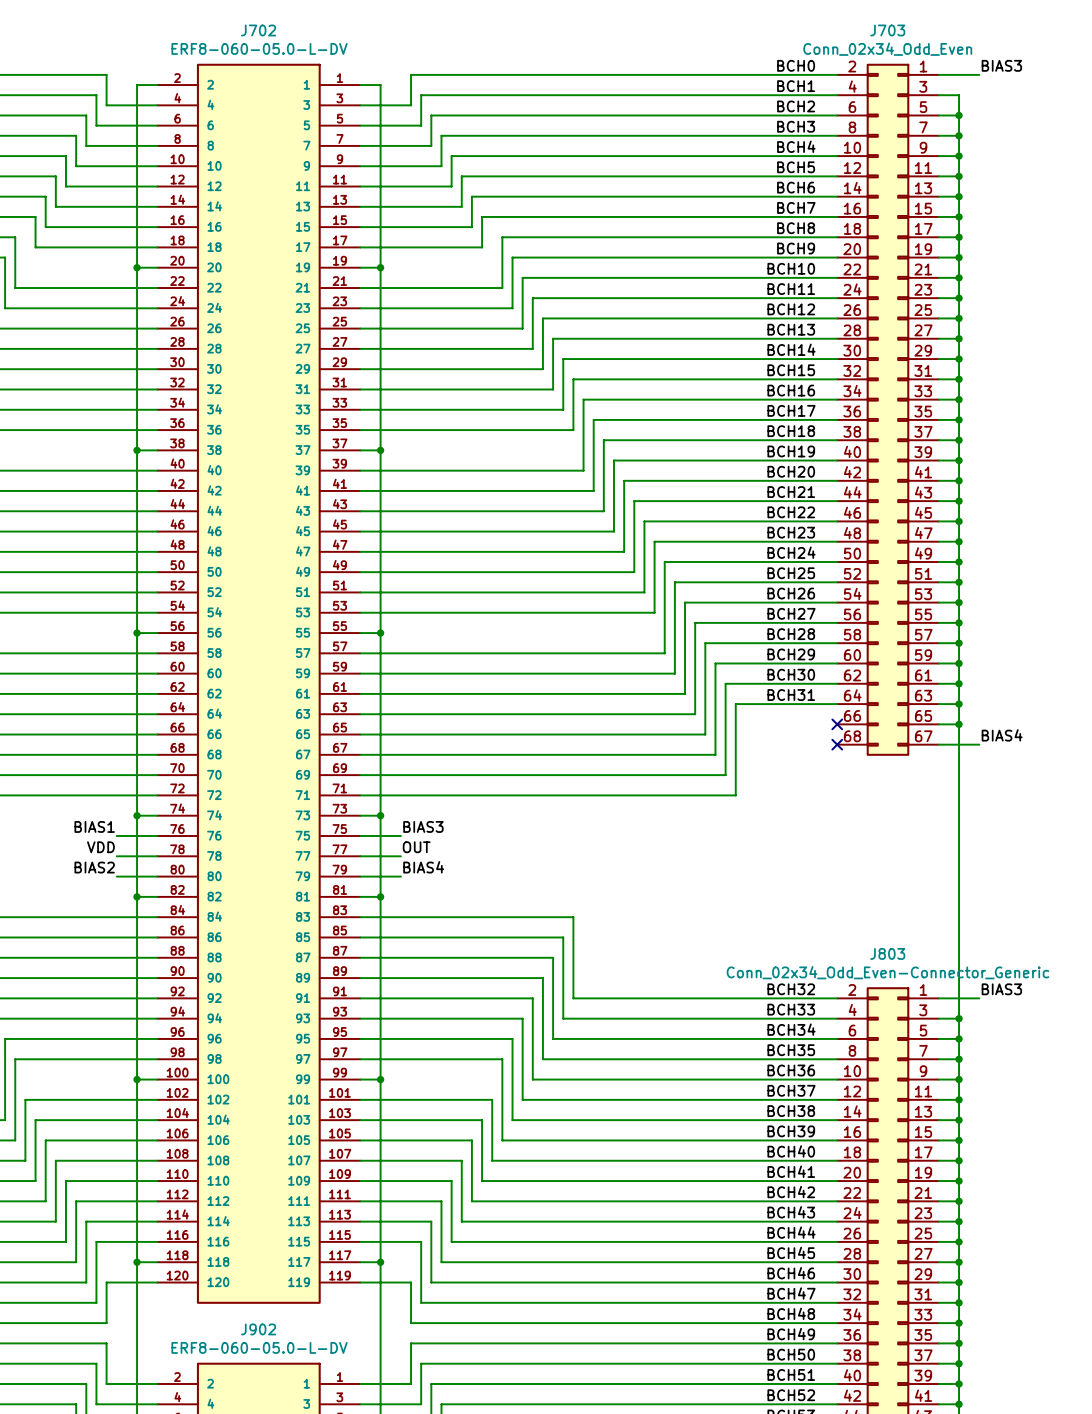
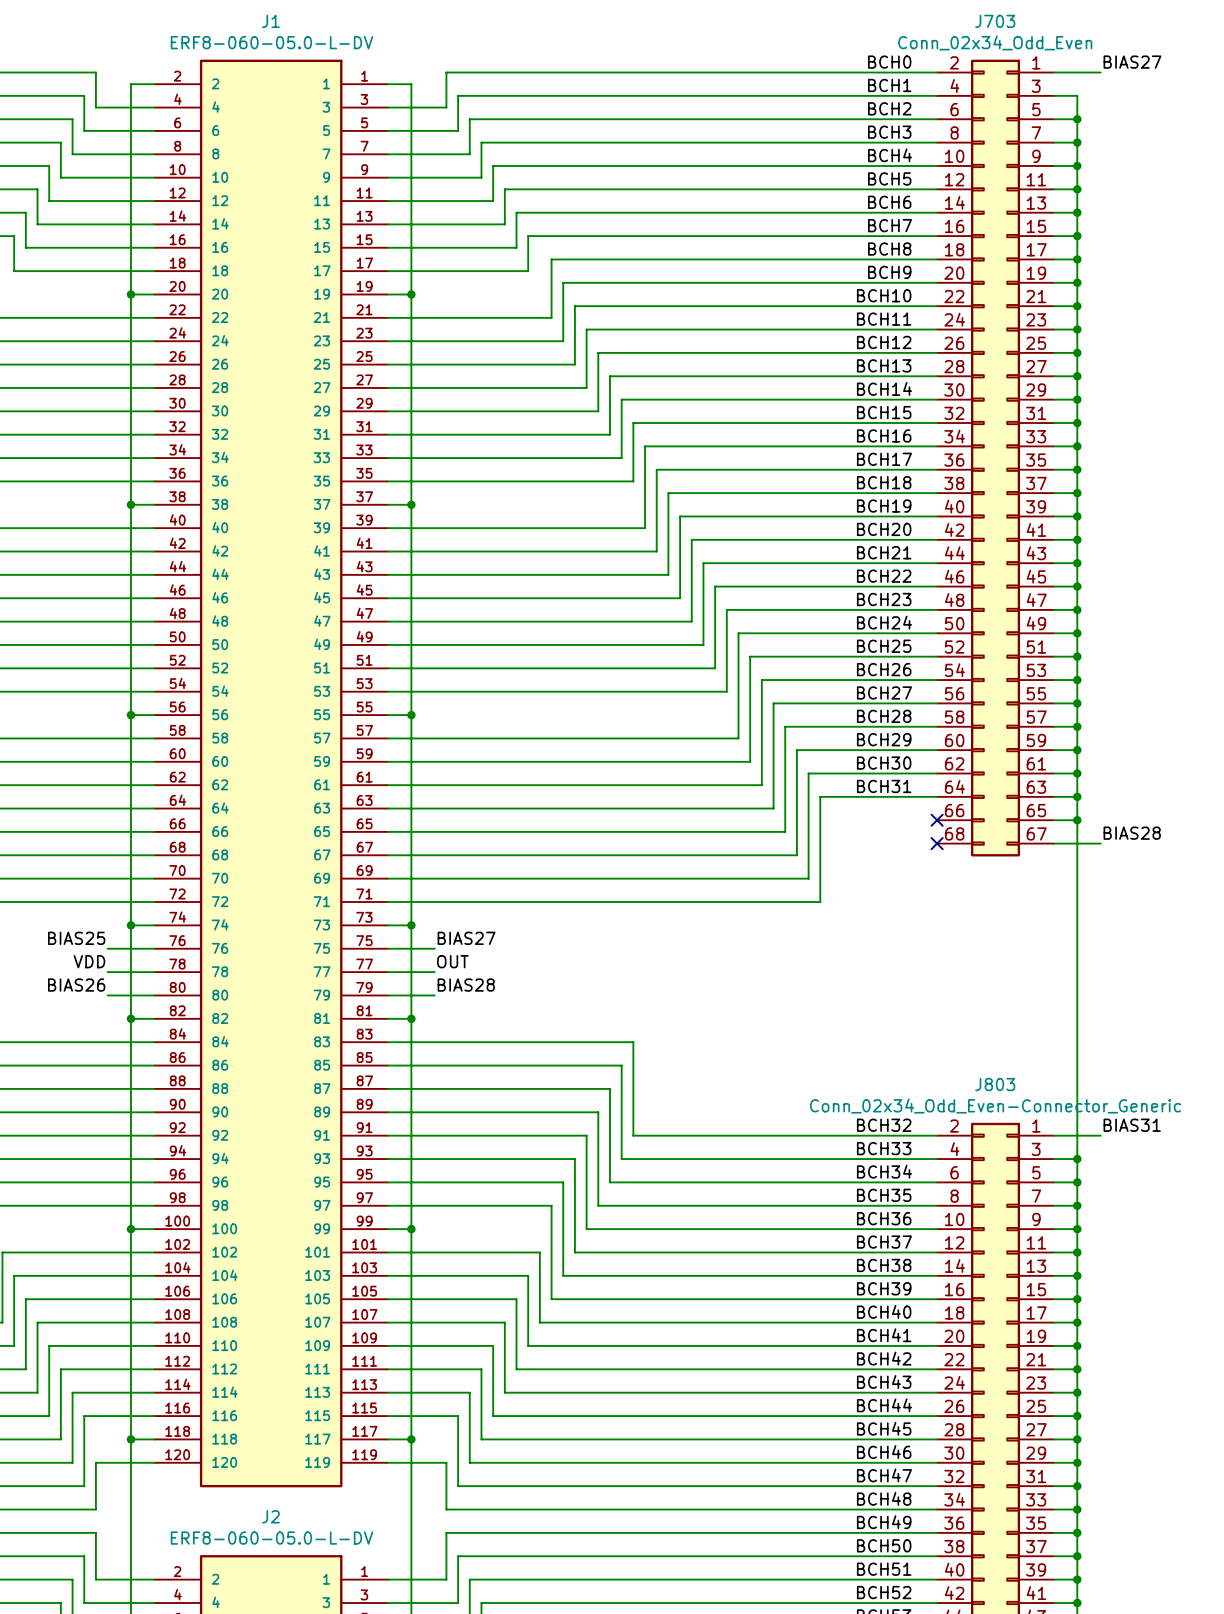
J702 name: J702 (258, 30) -> J1 (270, 21)
label: BIAS3 (1001, 65) -> BIAS27 (1132, 62)
label: BIAS4 (1002, 735) -> BIAS28 (1132, 833)
label: BIAS1 (94, 826) -> BIAS25 (76, 938)
label: BIAS3 (423, 826) -> BIAS27 (466, 938)
label: BIAS2 (94, 867) -> BIAS26 (76, 985)
label: BIAS4 (423, 867) -> BIAS28 (466, 985)
label: BIAS3 (1001, 989) -> BIAS31 (1132, 1125)
J902 name: J902 (258, 1329) -> J2 (270, 1516)

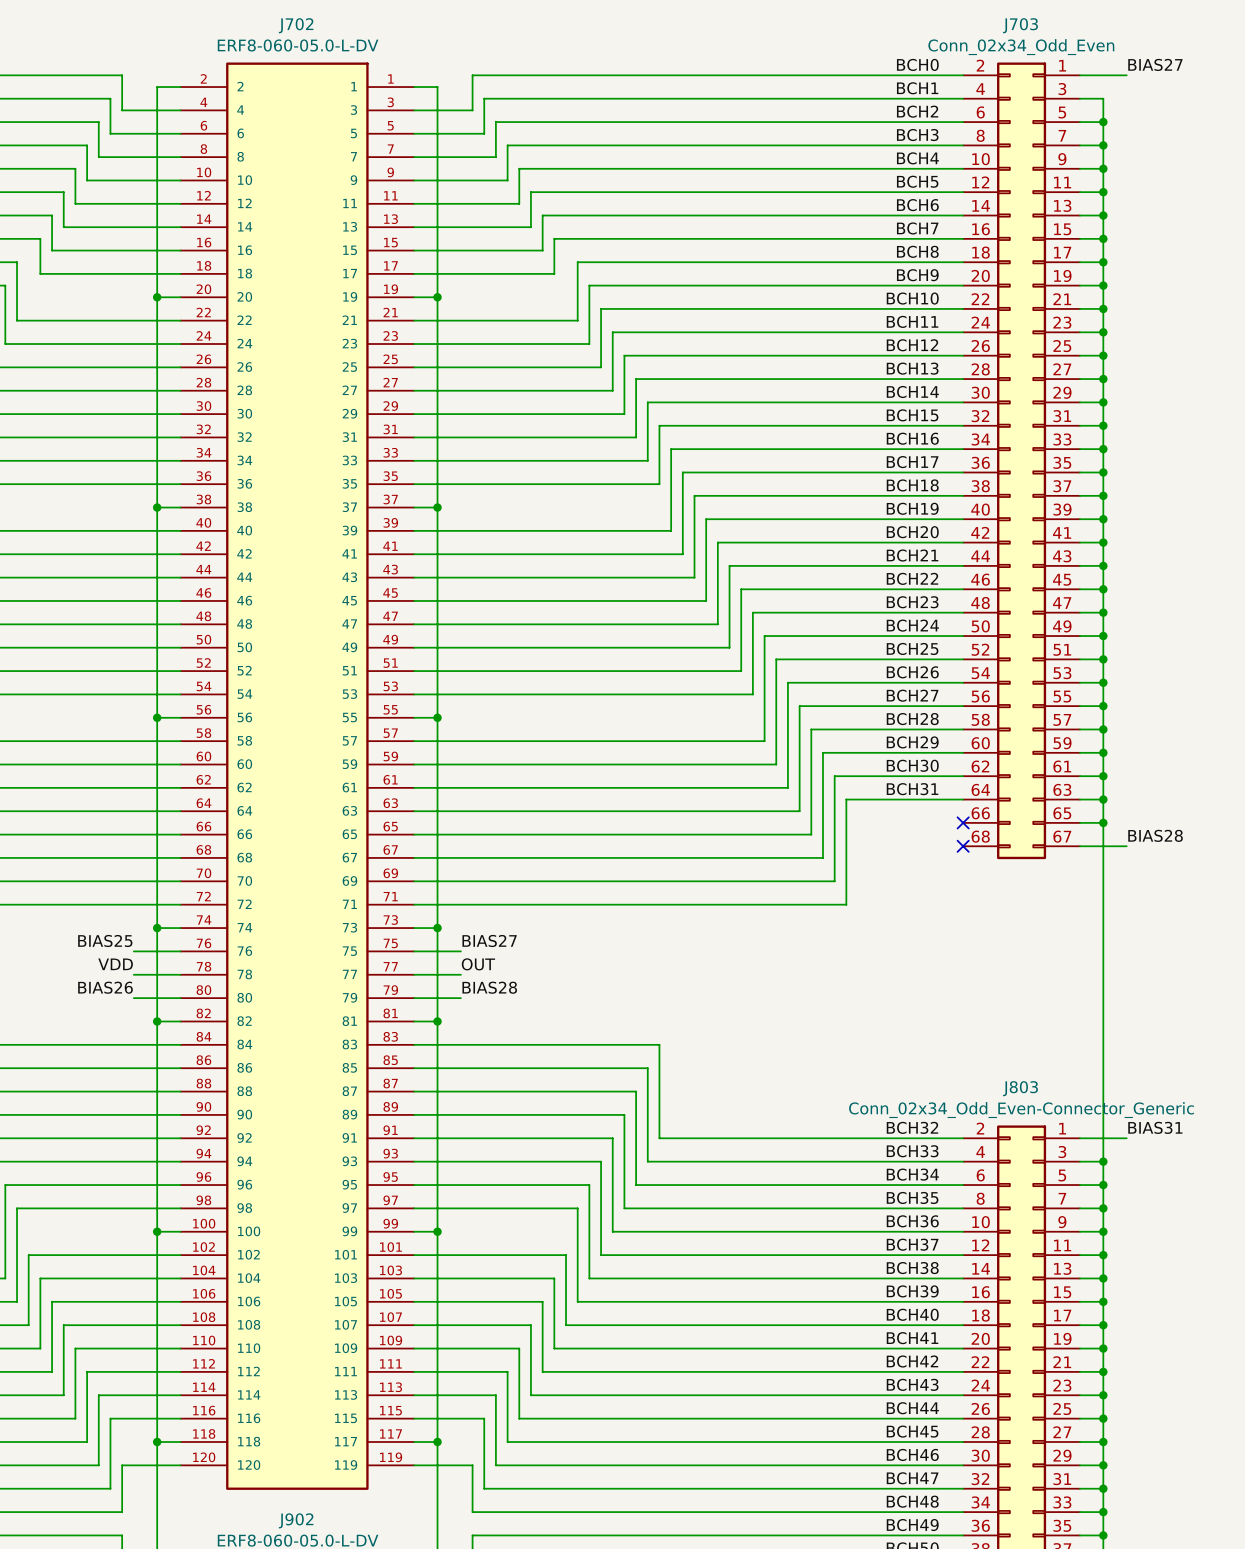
J1 name: J1 (270, 21) -> J702 (296, 25)
J2 name: J2 (270, 1516) -> J902 (296, 1520)

